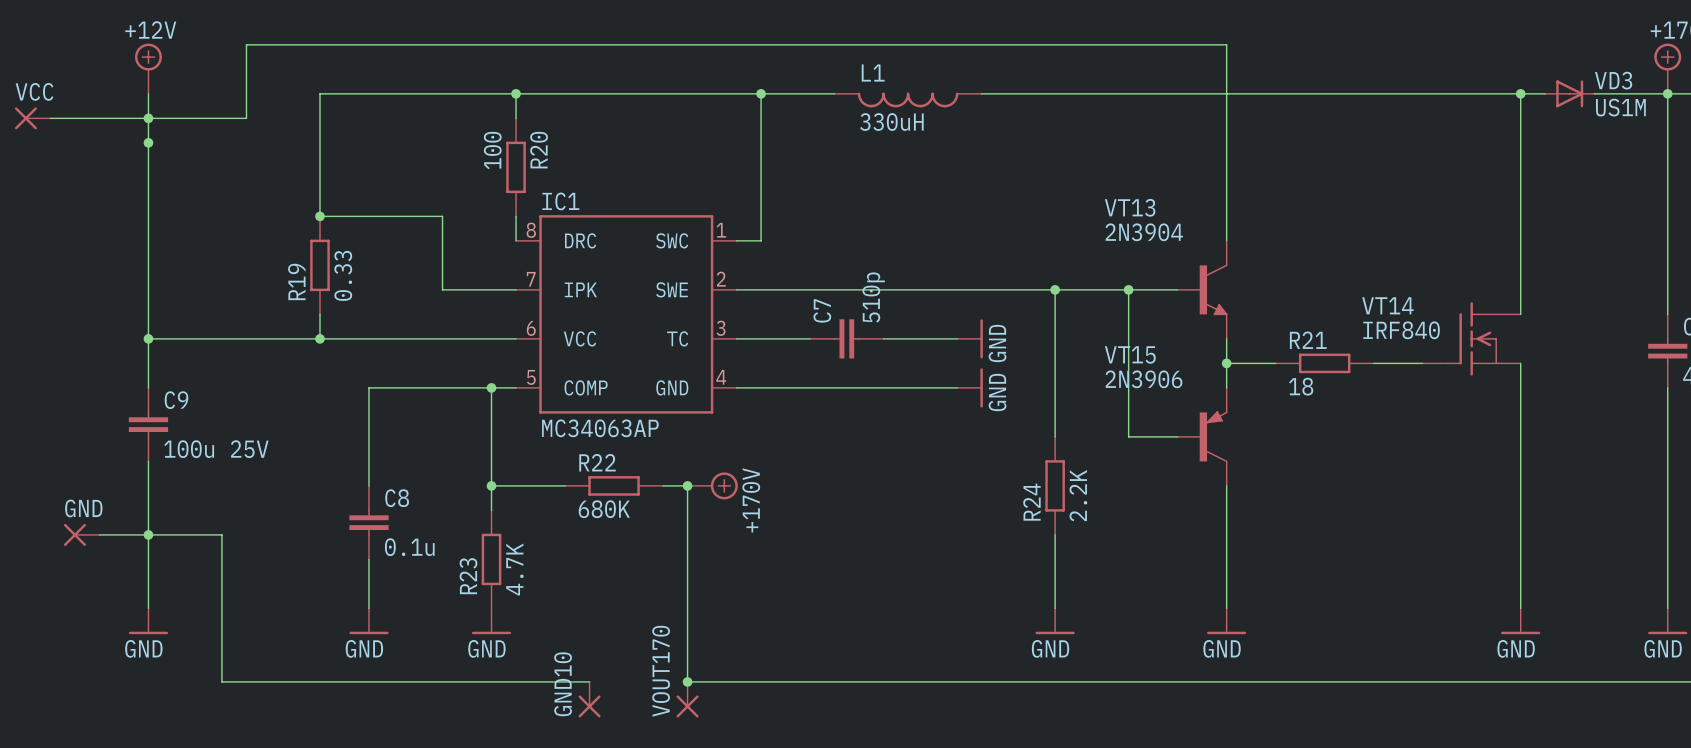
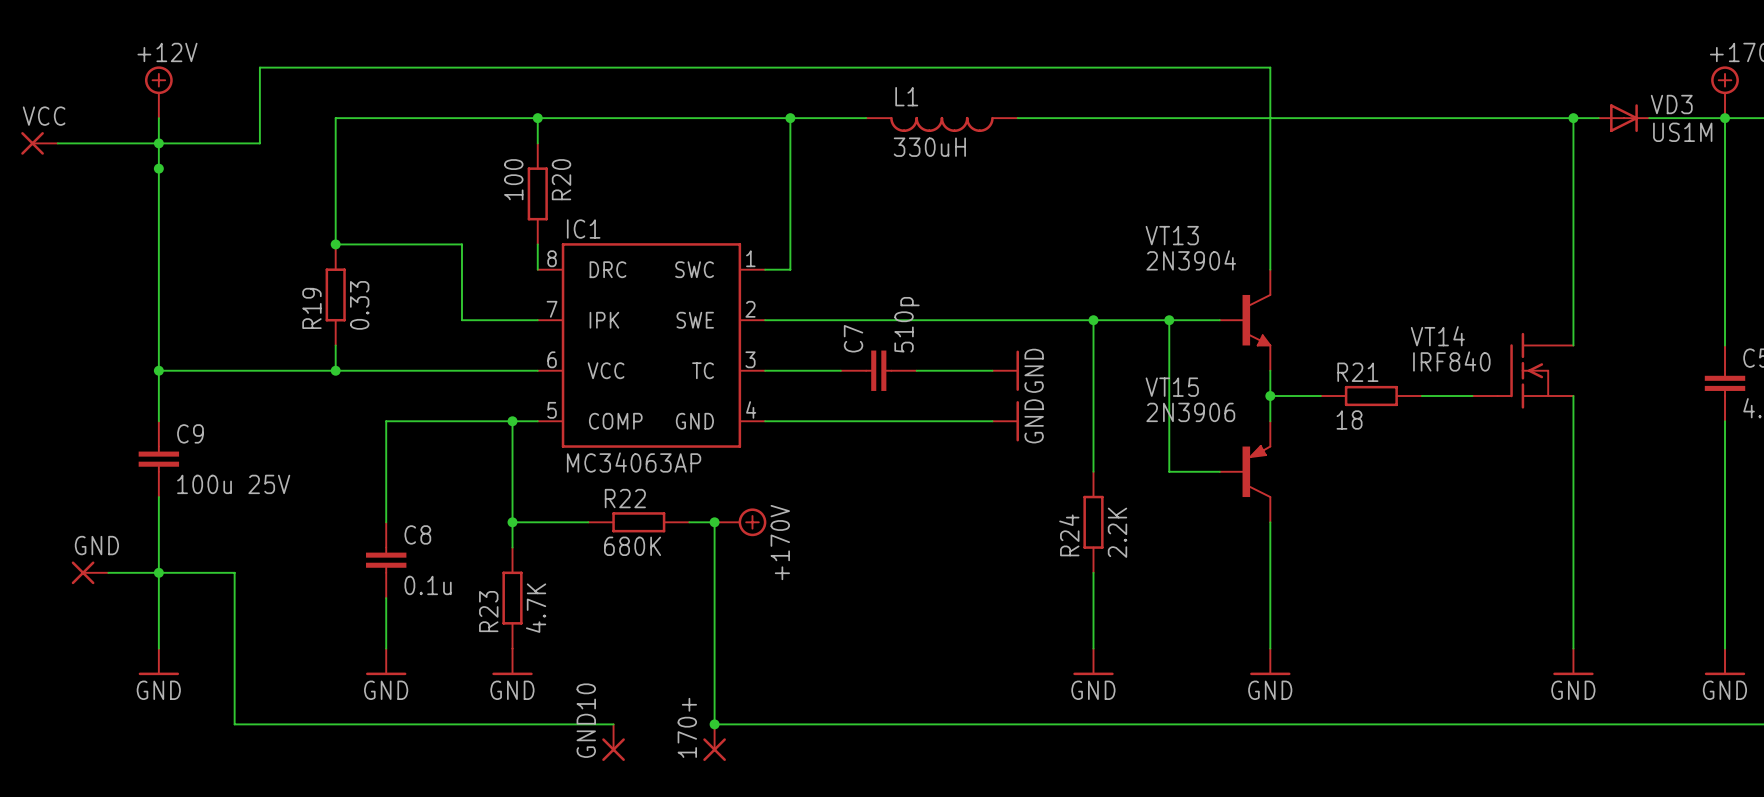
VOUT170 name: VOUT170 (661, 671) -> 170+ (687, 727)

